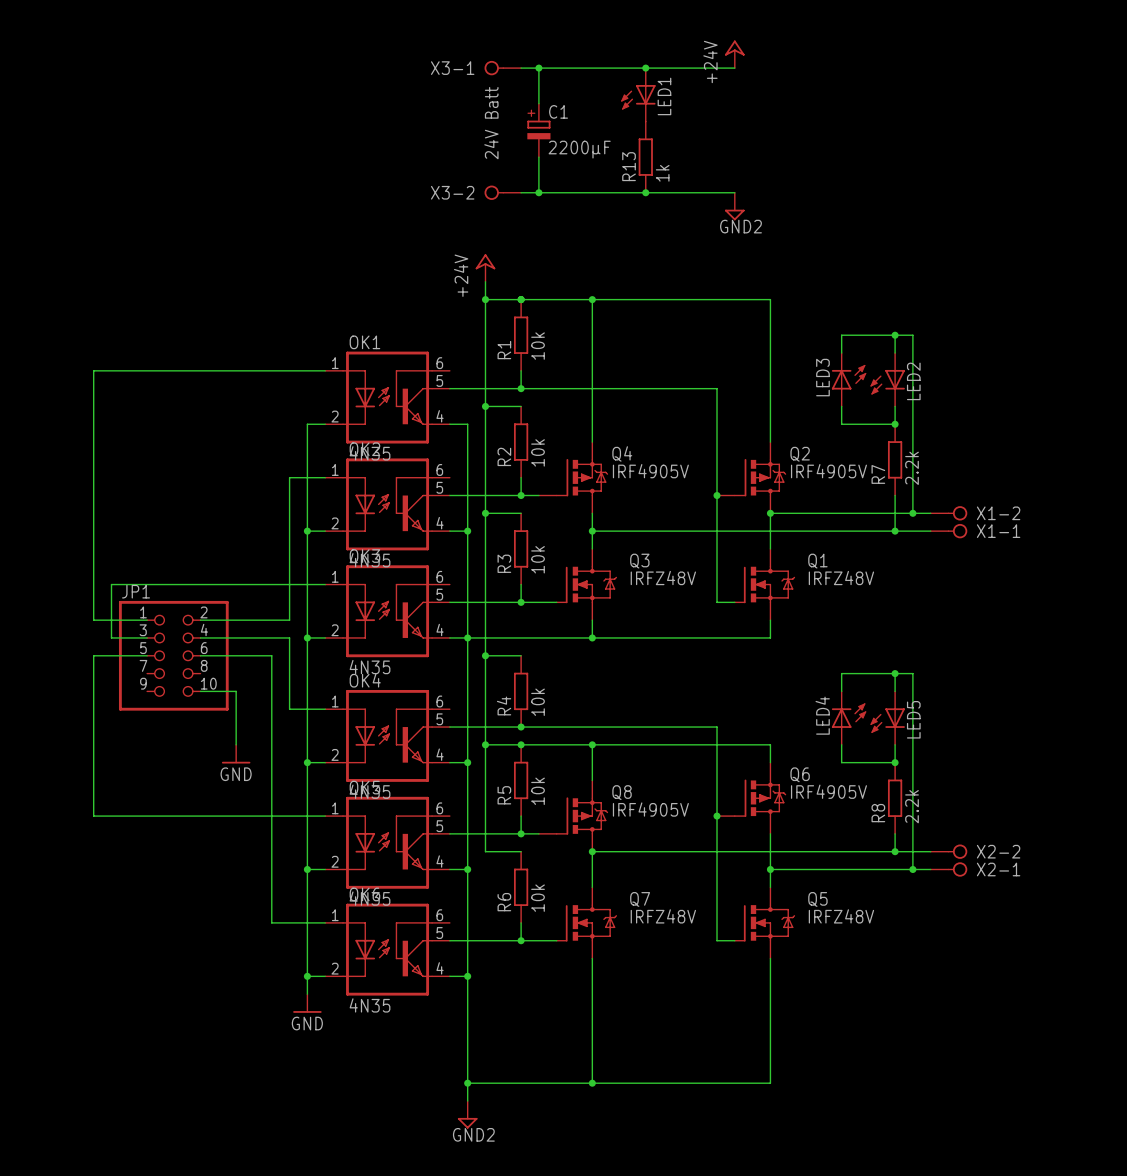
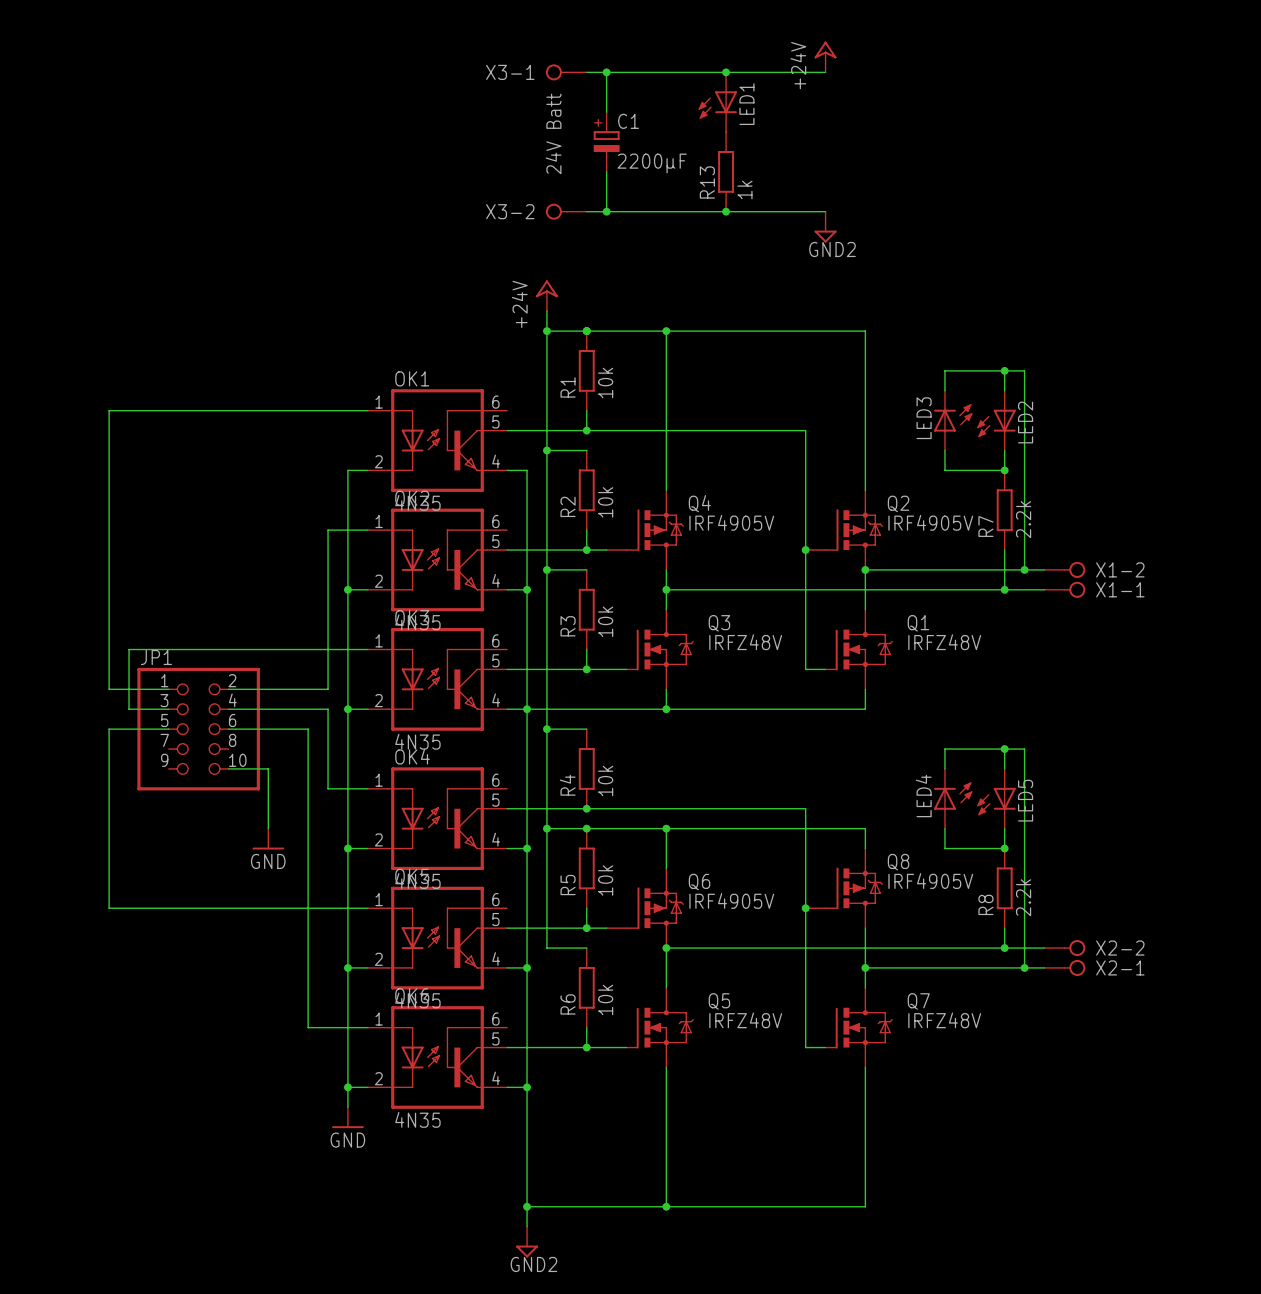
Q6 name: Q6 (800, 774) -> Q8 (898, 862)
Q8 name: Q8 (622, 792) -> Q6 (699, 882)
Q7 name: Q7 (640, 899) -> Q5 (719, 1001)
Q5 name: Q5 (817, 899) -> Q7 (918, 1001)

